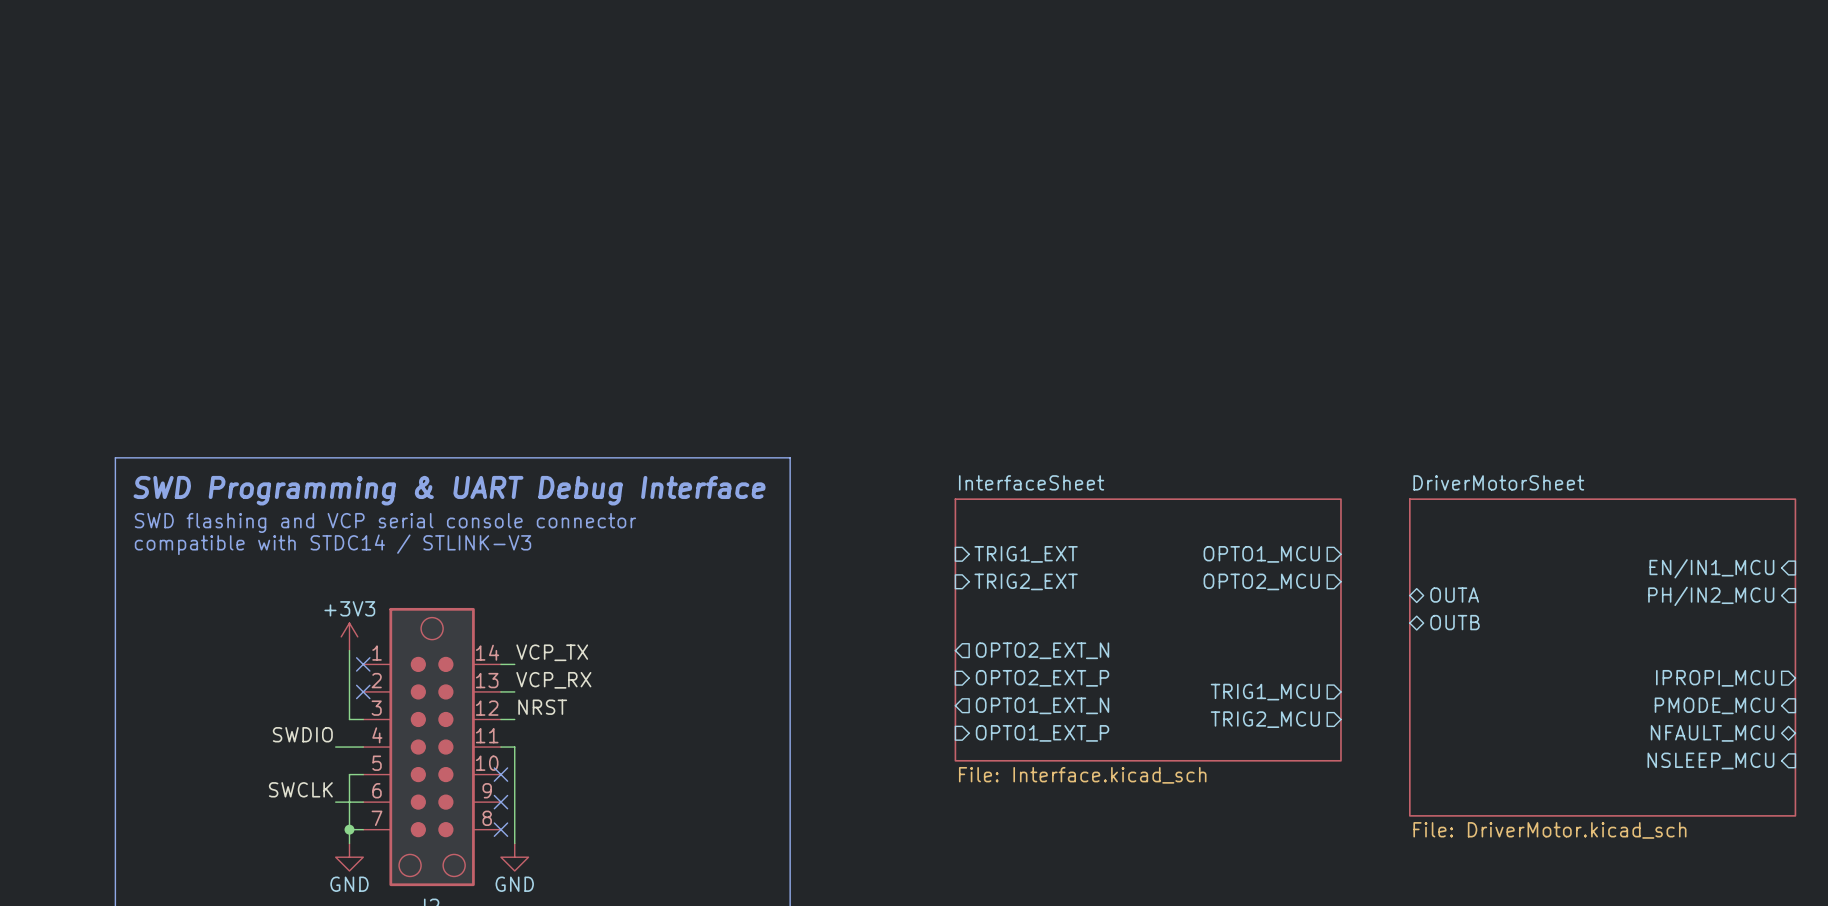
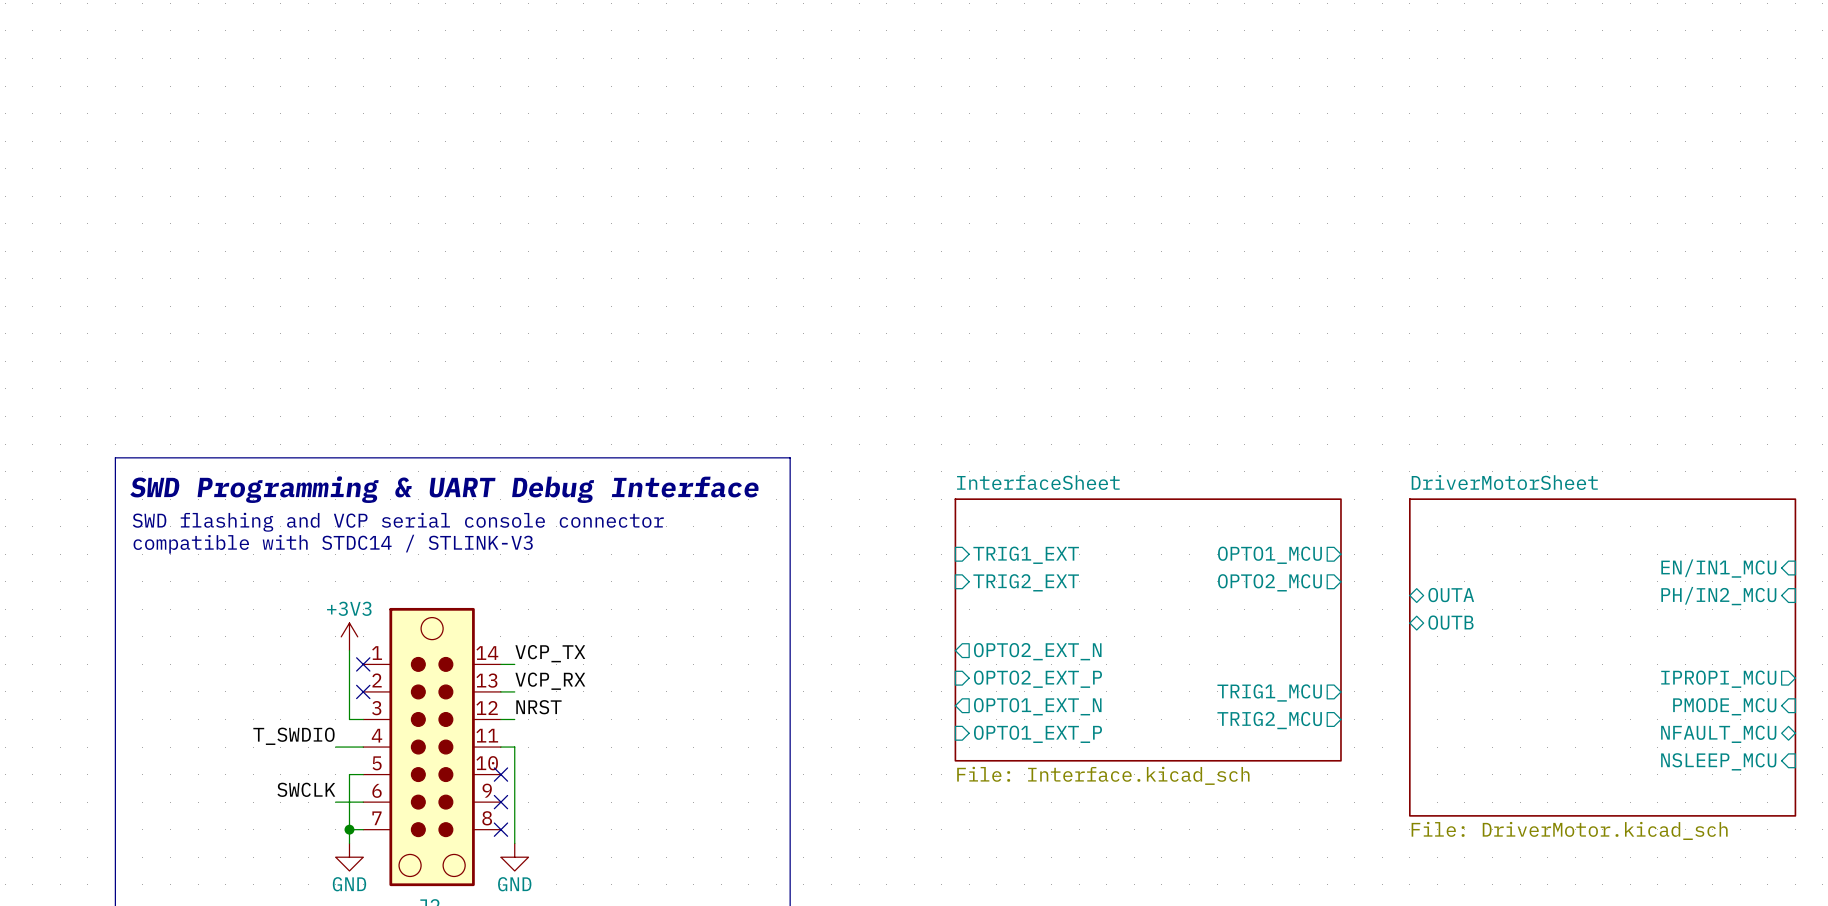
label: SWDIO (302, 734) -> T_SWDIO (293, 736)

